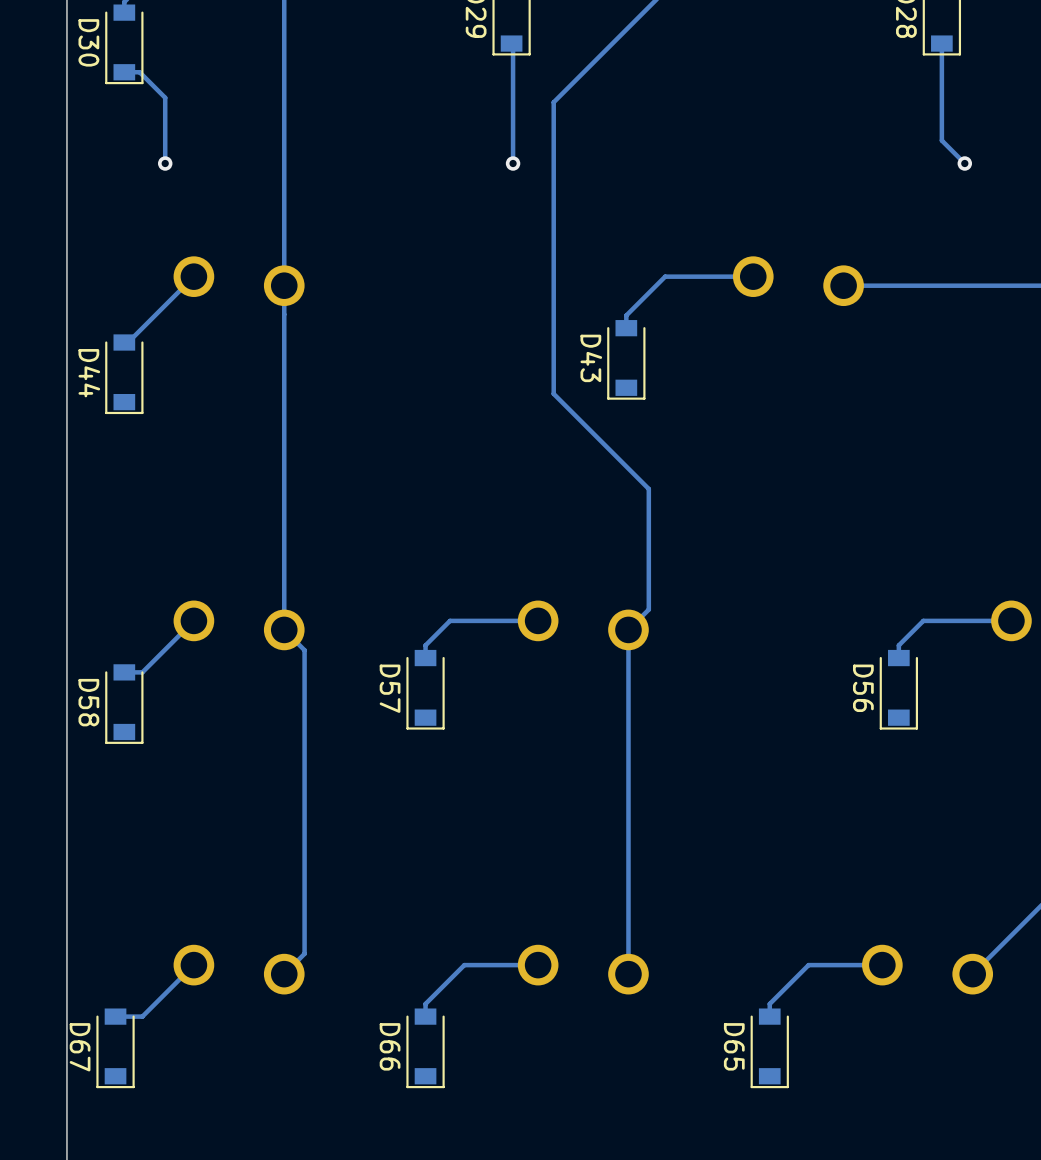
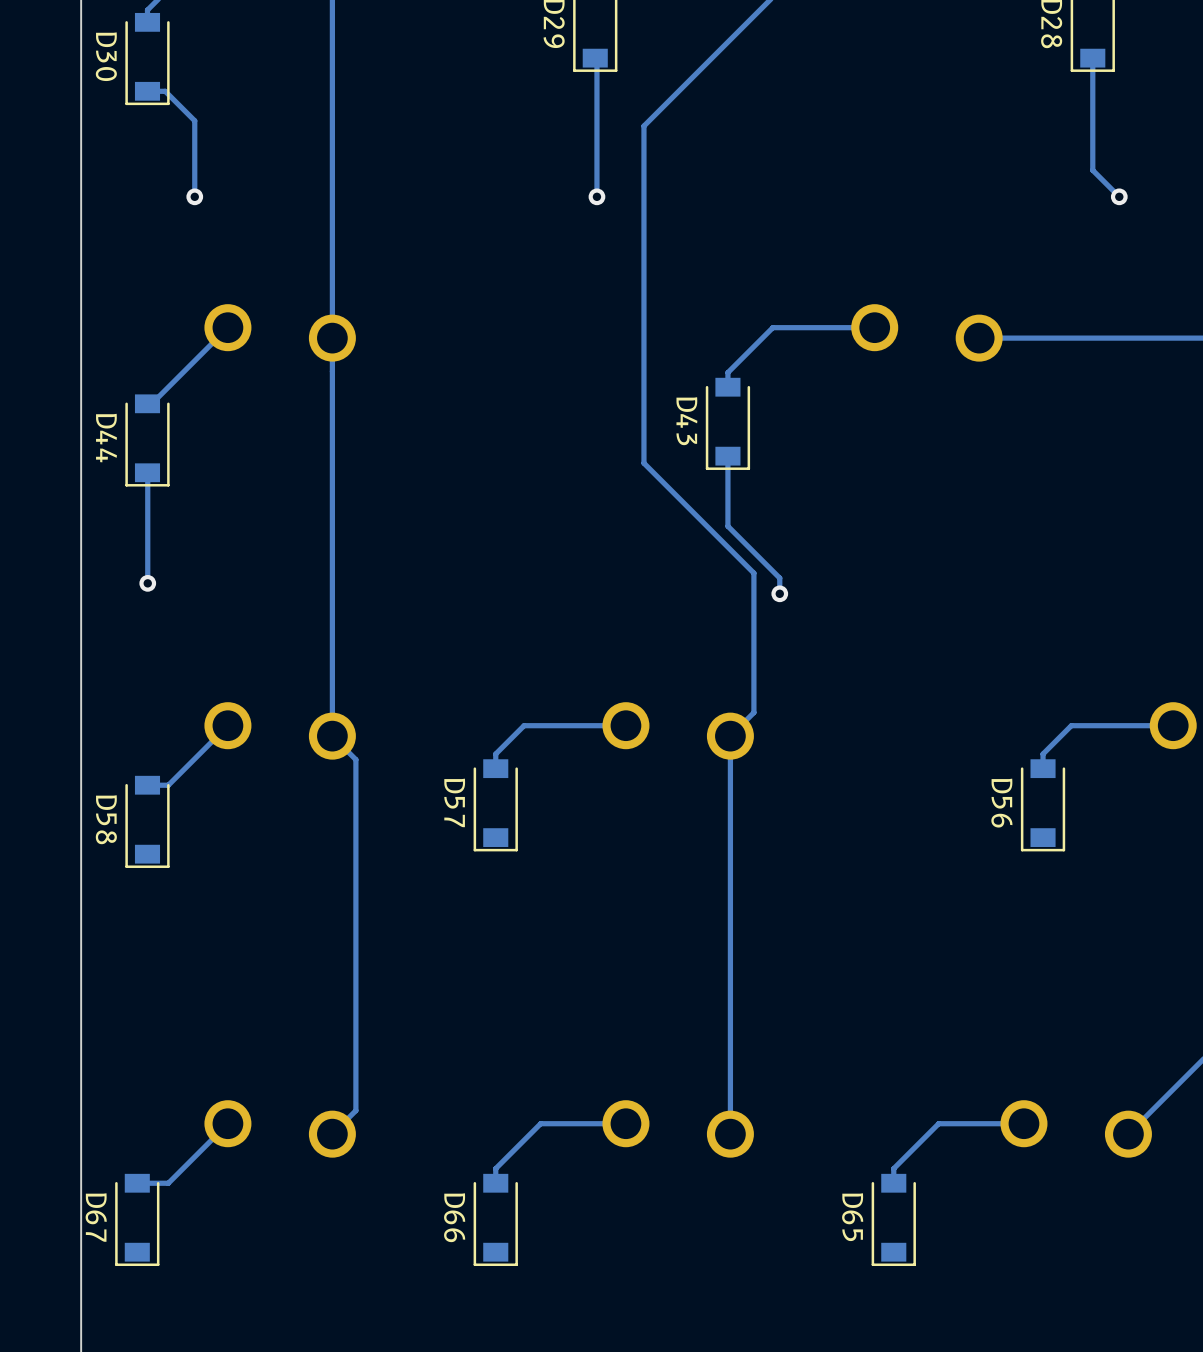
track: none -> (727, 456) (727, 526) (779, 578) (779, 593)
track: none -> (147, 473) (147, 583)
via: none -> (147, 583)
via: none -> (779, 593)

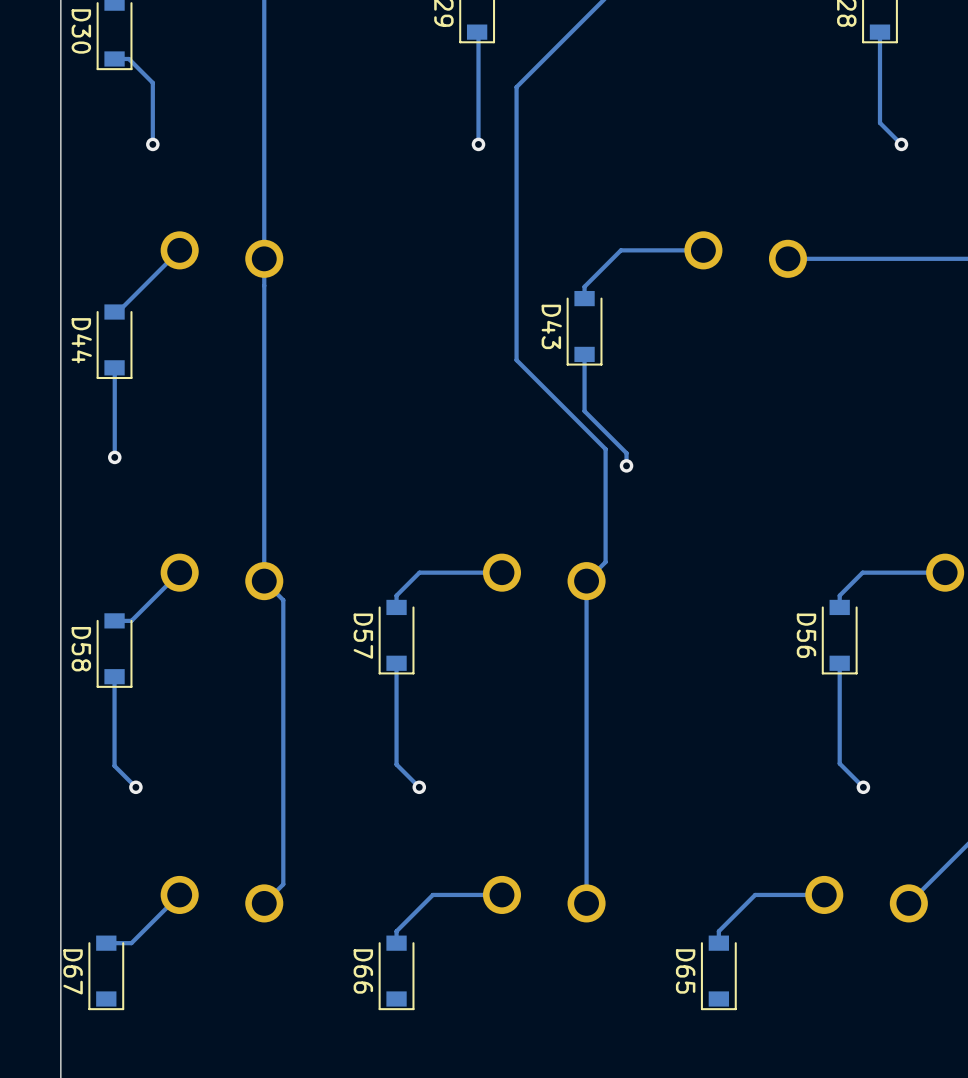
track: none -> (396, 663) (396, 764) (419, 787)
track: none -> (839, 663) (839, 763) (863, 787)
track: none -> (114, 676) (114, 765) (135, 787)
via: none -> (135, 787)
via: none -> (419, 787)
via: none -> (863, 787)

